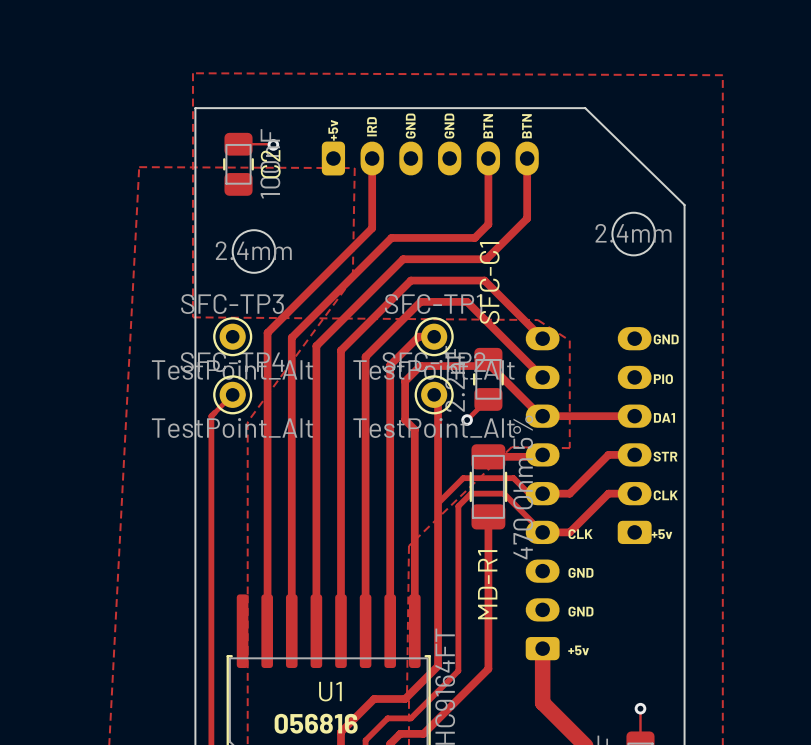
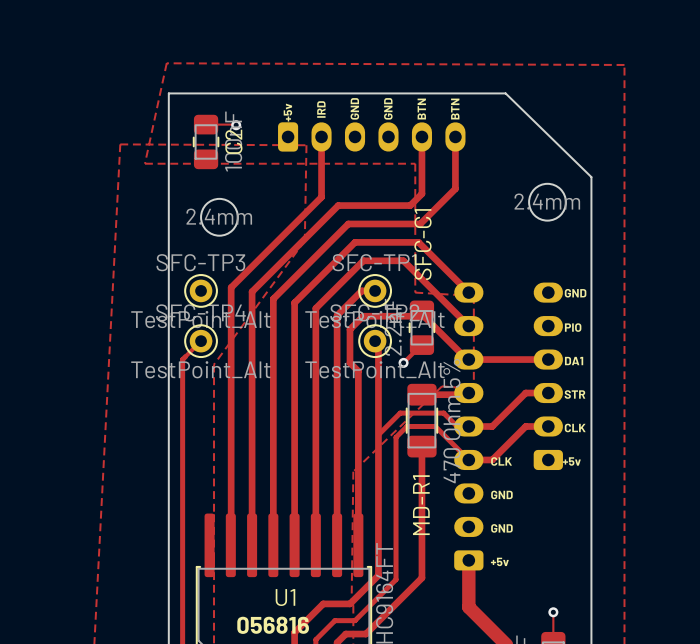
zone outline: (192, 73) (192, 317) (537, 320) (569, 340) (569, 448) (511, 447) -> (166, 63) (144, 163) (415, 163) (415, 292) (473, 295) (473, 388) (442, 386)

